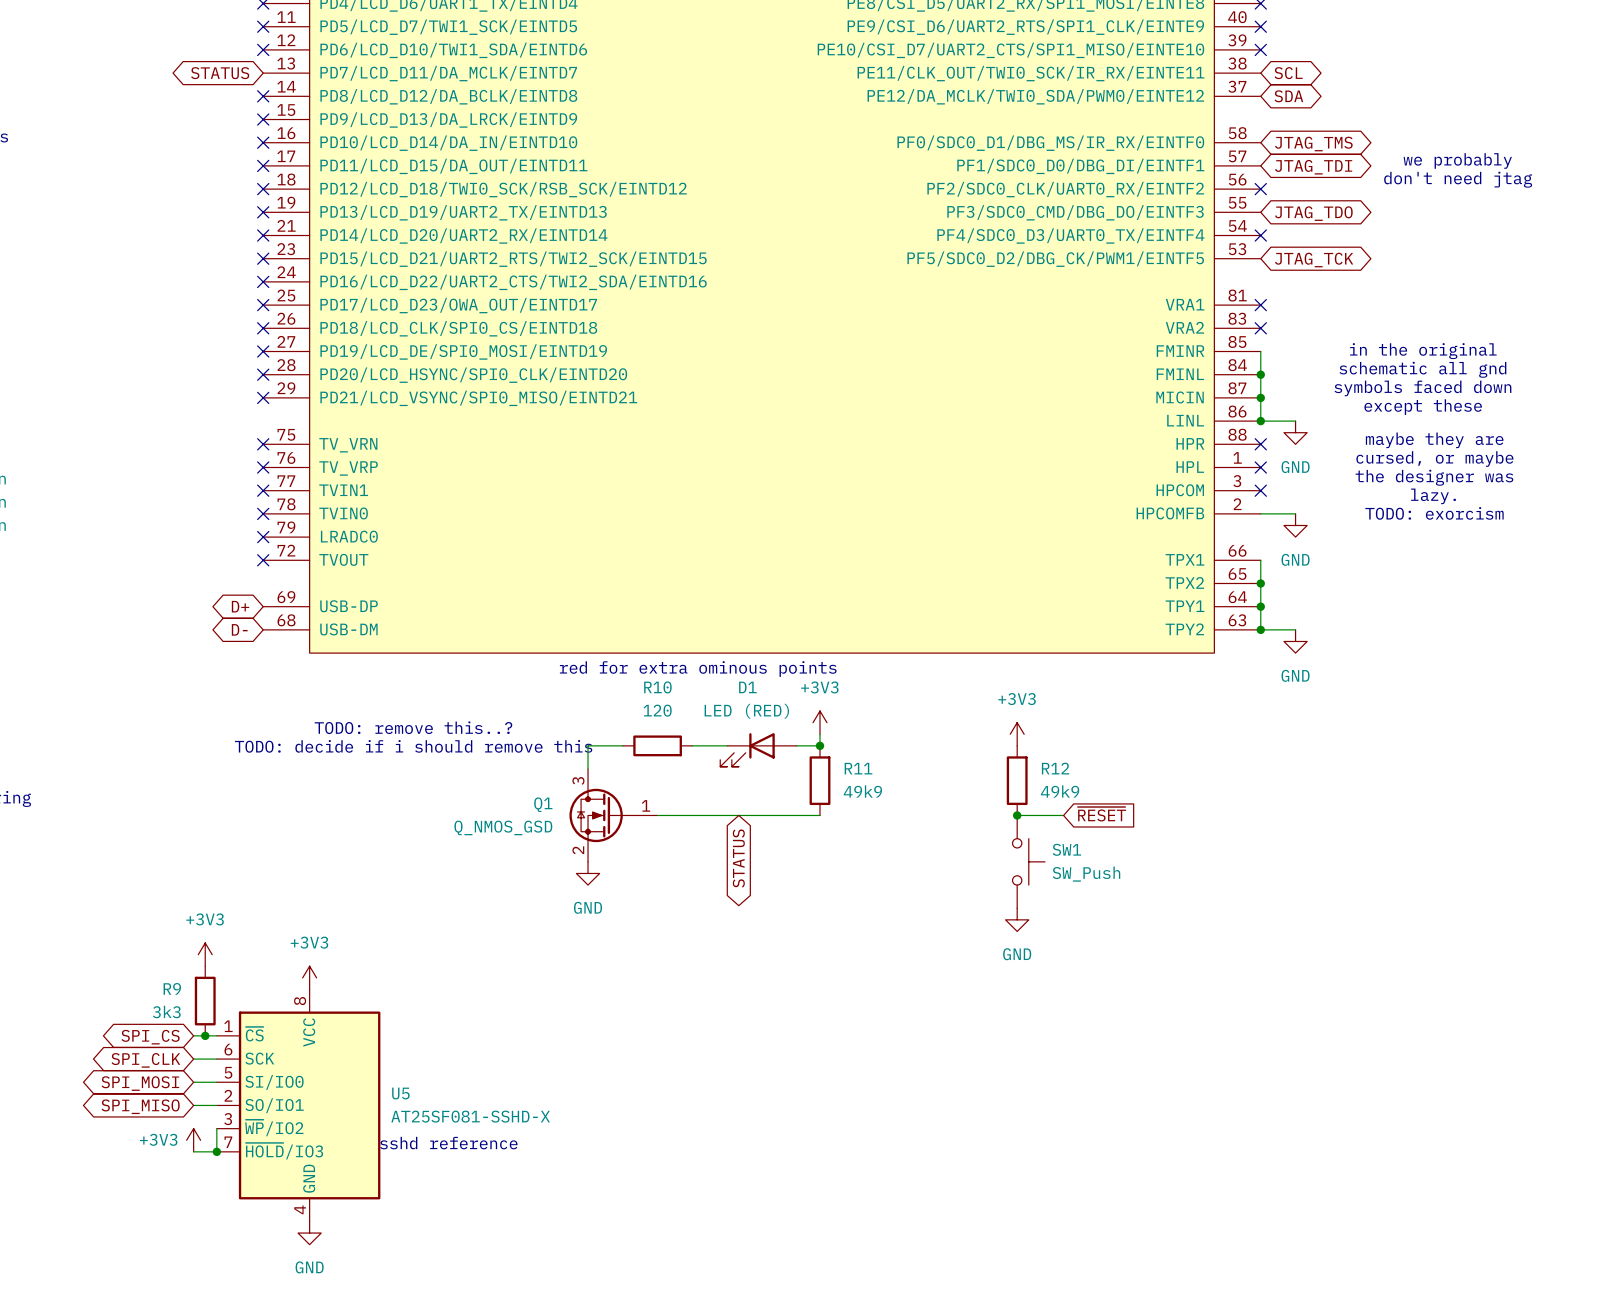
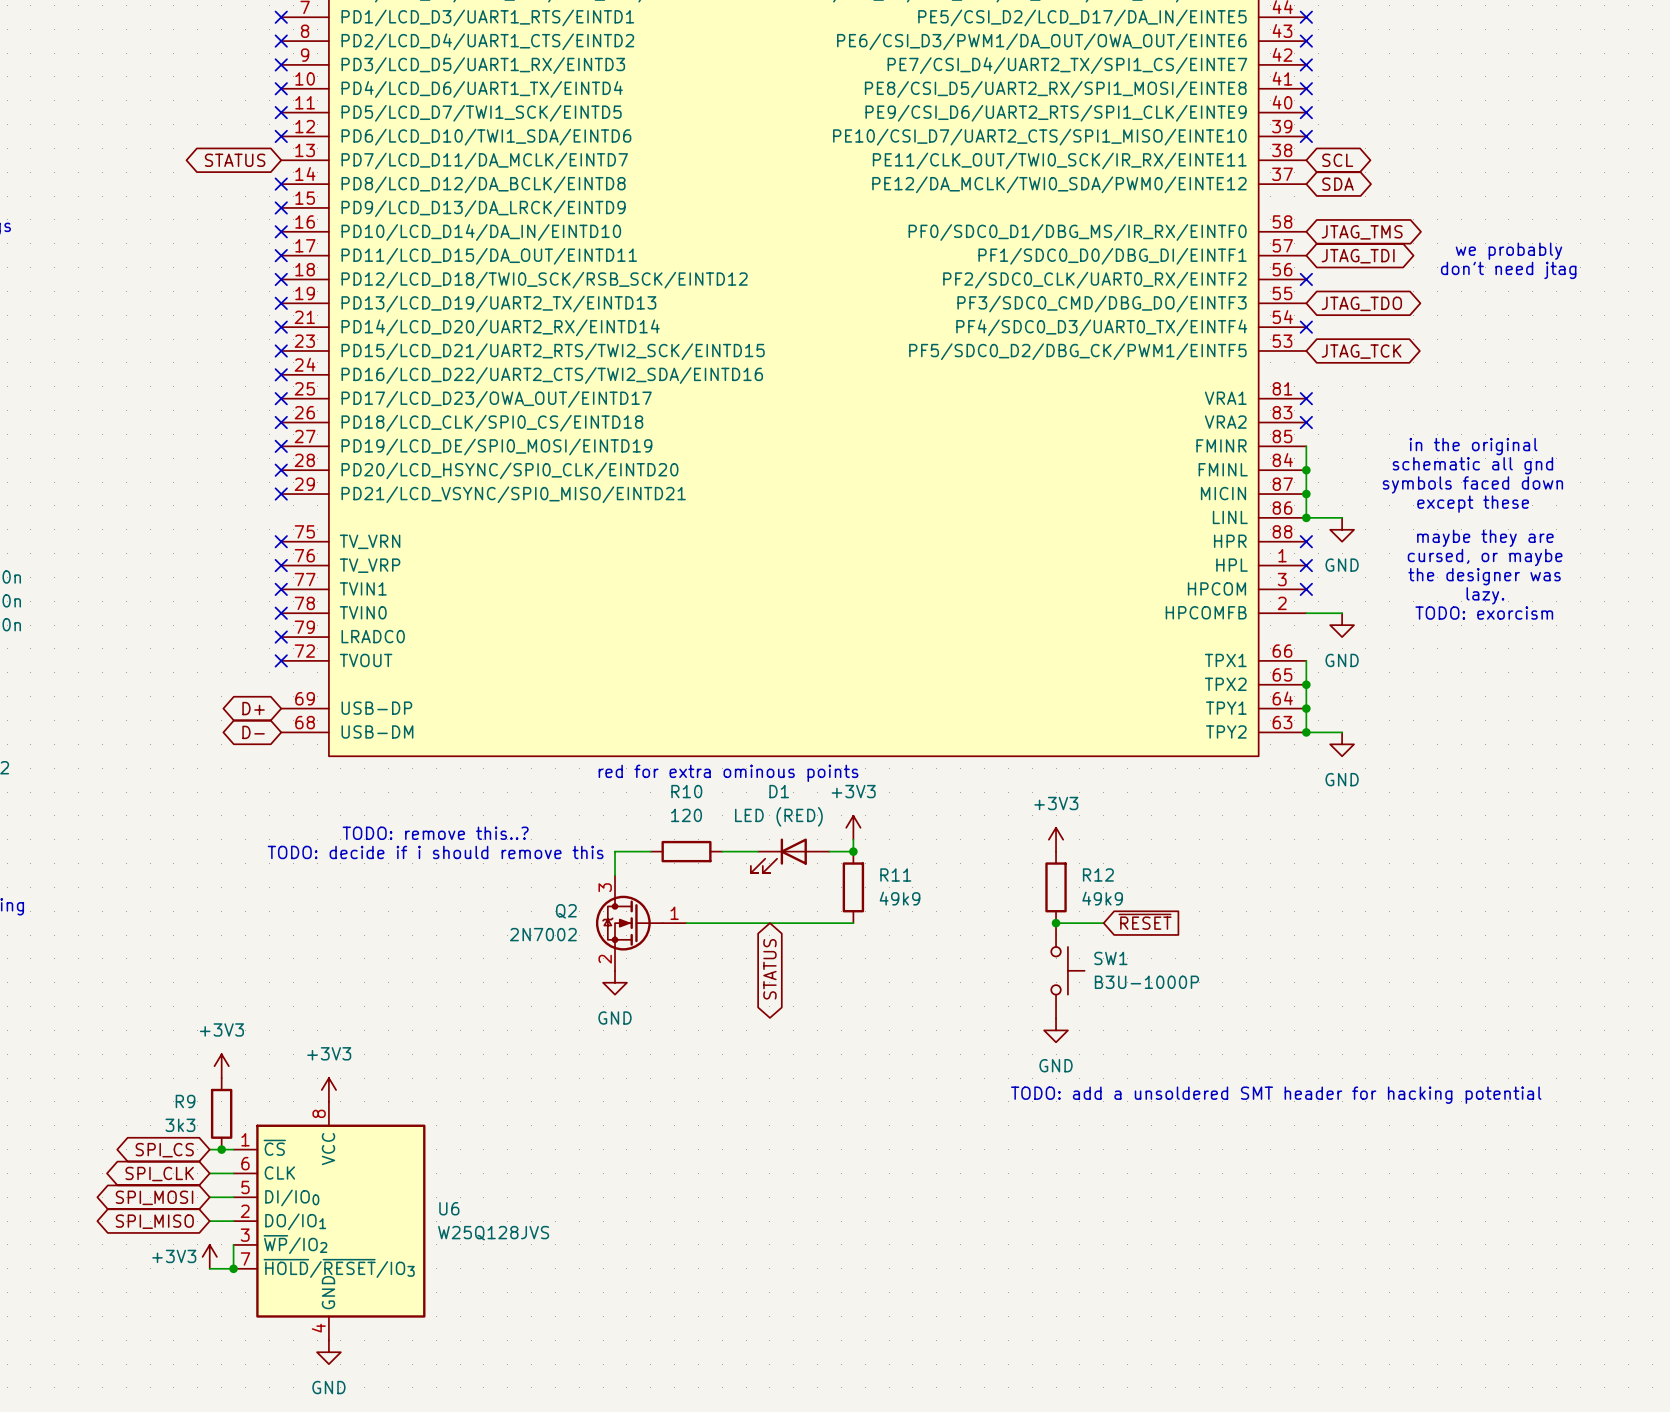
Q1: Q_NMOS_GSD (613, 815) -> none
Q2: none -> 2N7002 (641, 923)
SW1 value: SW_Push (1086, 874) -> B3U-1000P (1146, 982)
text: none -> TODO: add a unsoldered SMT header for hacking potential (1276, 1095)
U5: AT25SF081-SSHD-X (298, 1105) -> none
U6: none -> W25Q128JVS (329, 1221)
text: sshd reference (448, 1143) -> none

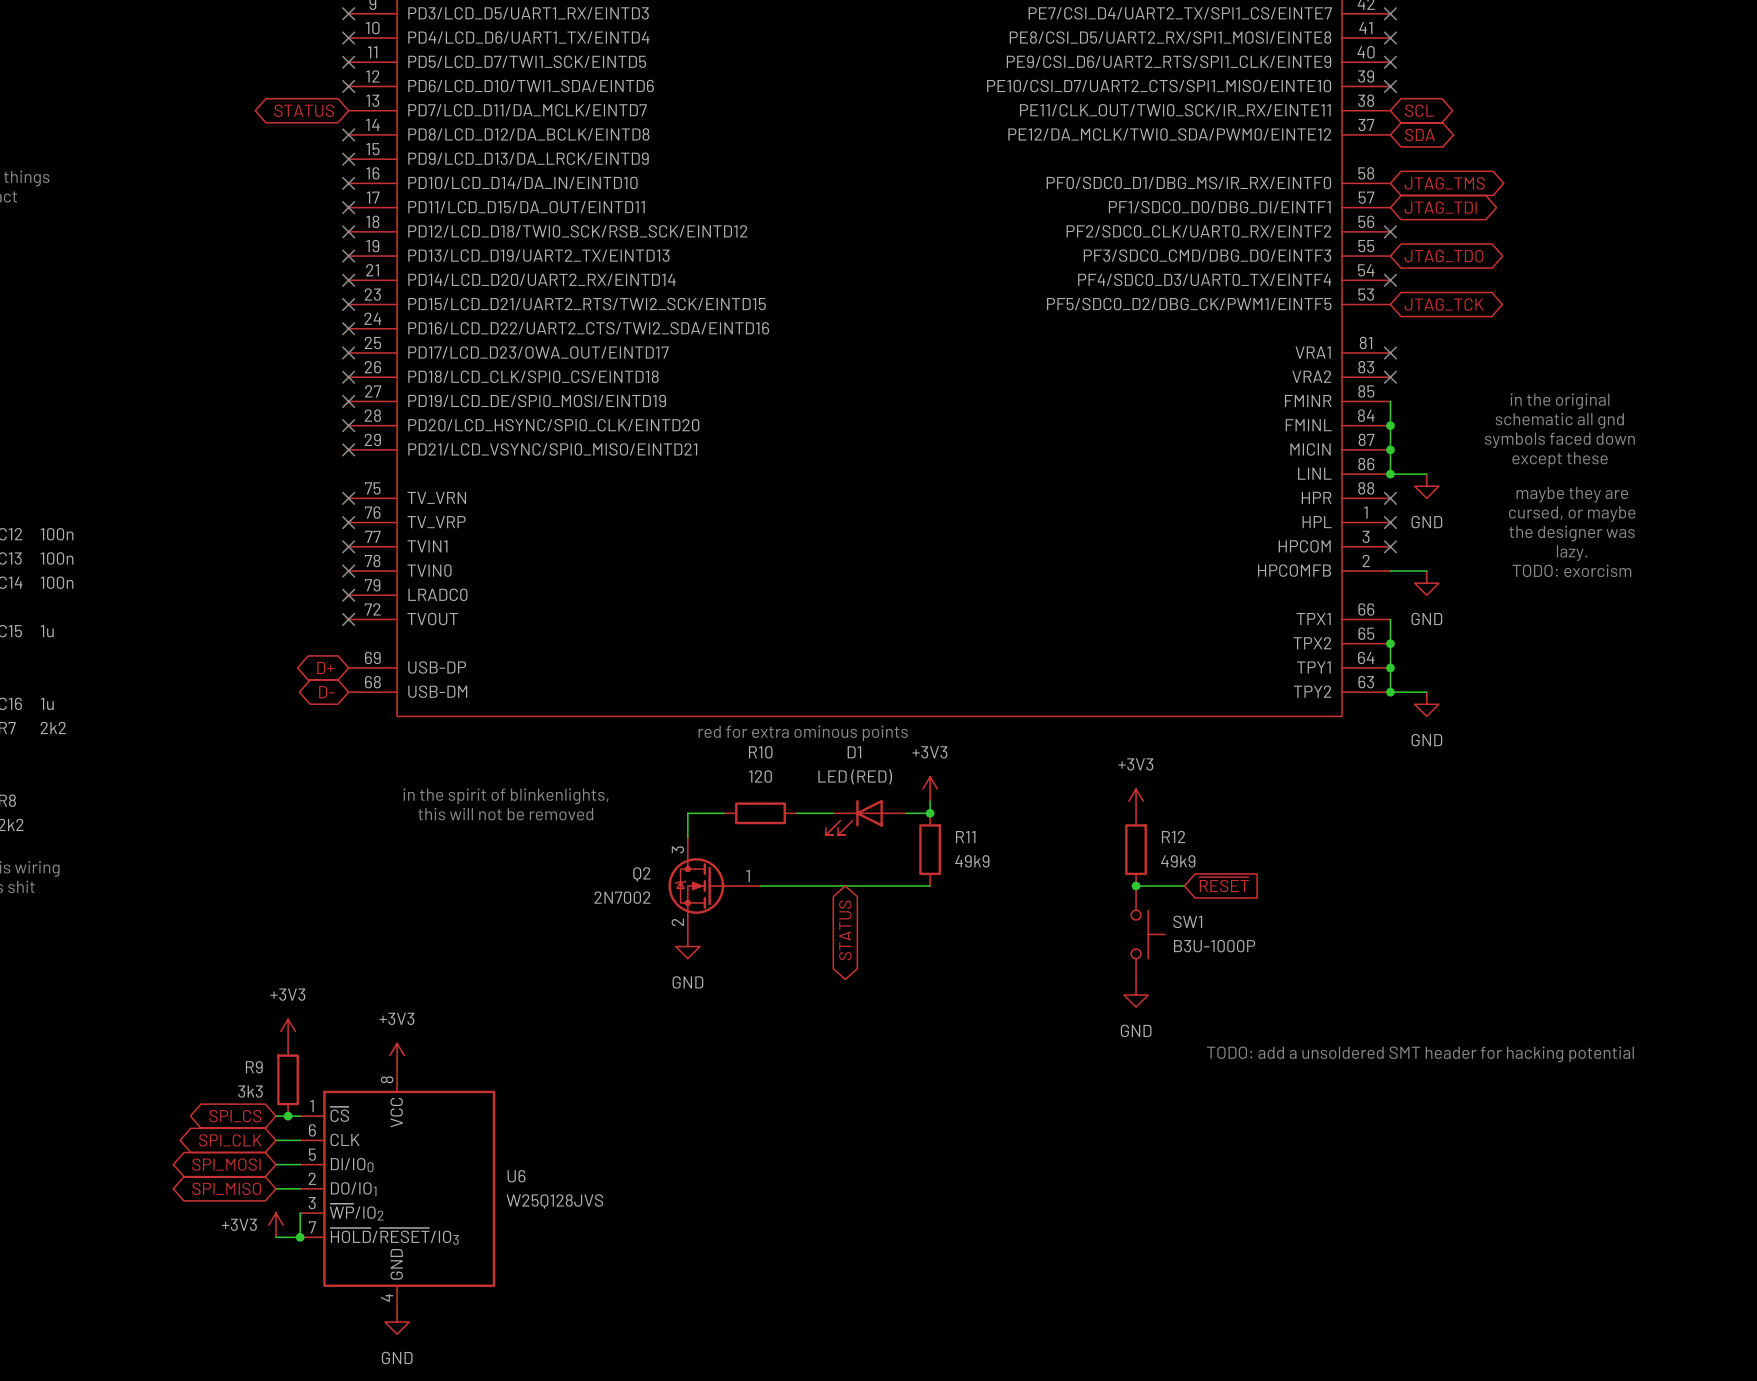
text: we probably (1508, 251) -> none
text: don't need jtag (1508, 270) -> none
text: TODO: remove this..? (435, 833) -> in the spirit of blinkenlights, (505, 796)
text: TODO: decide if i should remove this (435, 852) -> this will not be removed (505, 814)
text position: TODO: add a unsoldered SMT header for hacking potential (1276, 1095) -> TODO: add a unsoldered SMT header for hacking potential (1420, 1054)

